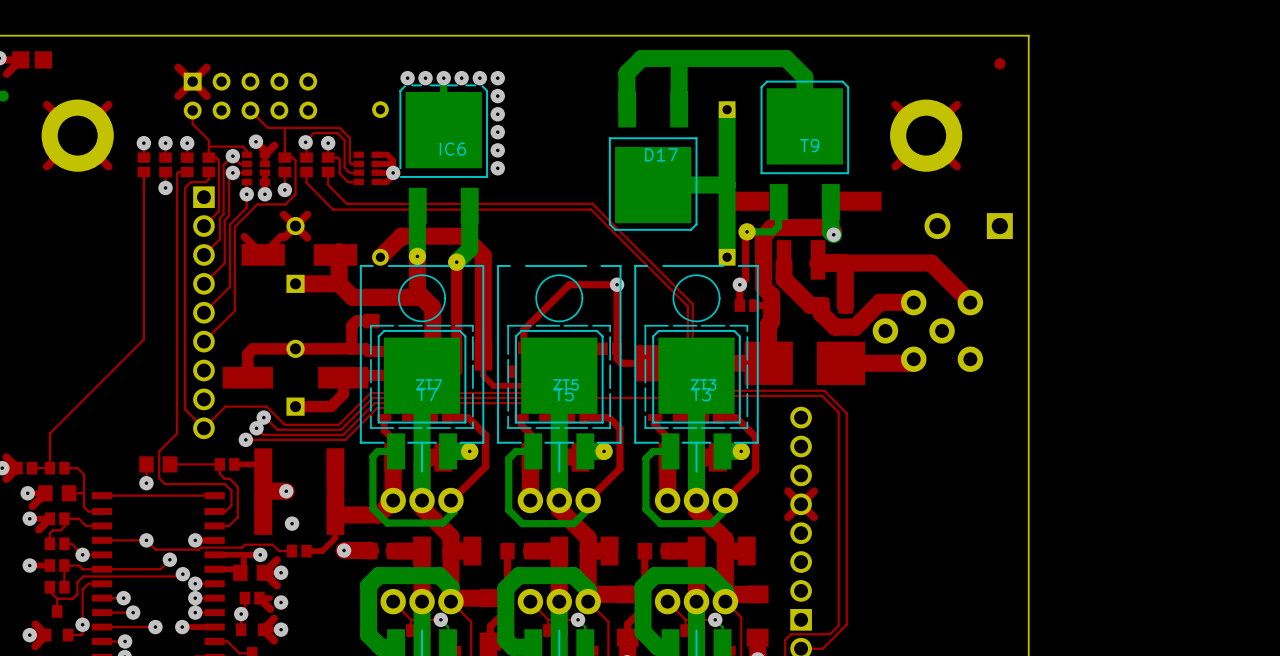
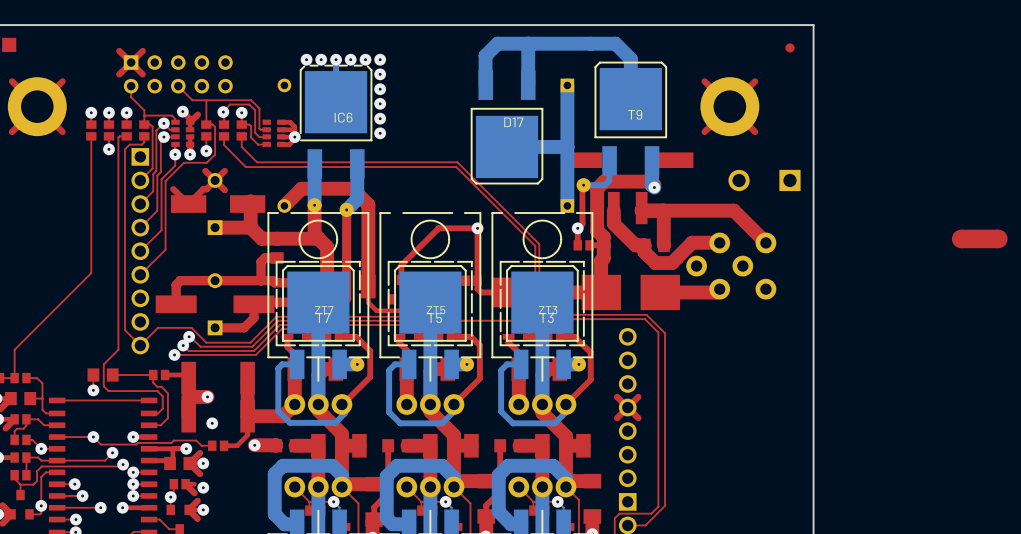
part: none -> (979, 238)

